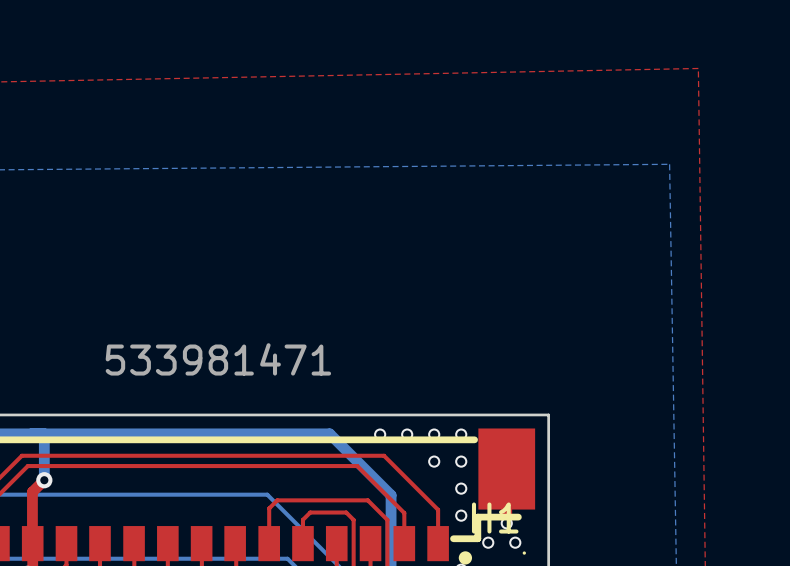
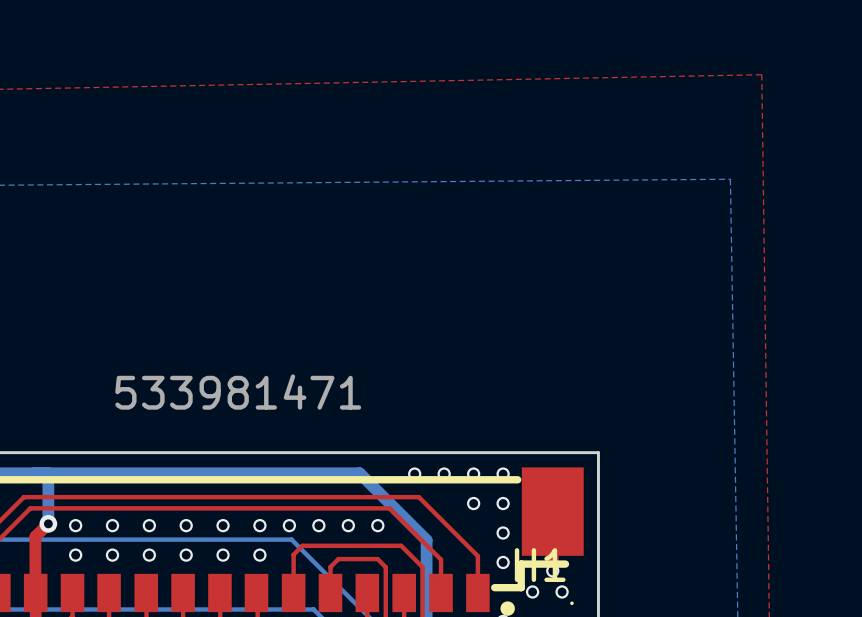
via: none -> (75, 525)
via: none -> (112, 525)
via: none -> (149, 525)
via: none -> (186, 525)
via: none -> (223, 525)
via: none -> (259, 525)
via: none -> (289, 525)
via: none -> (318, 525)
via: none -> (348, 525)
via: none -> (377, 525)
via: none -> (75, 555)
via: none -> (112, 555)
via: none -> (149, 555)
via: none -> (186, 555)
via: none -> (223, 555)
via: none -> (259, 555)

